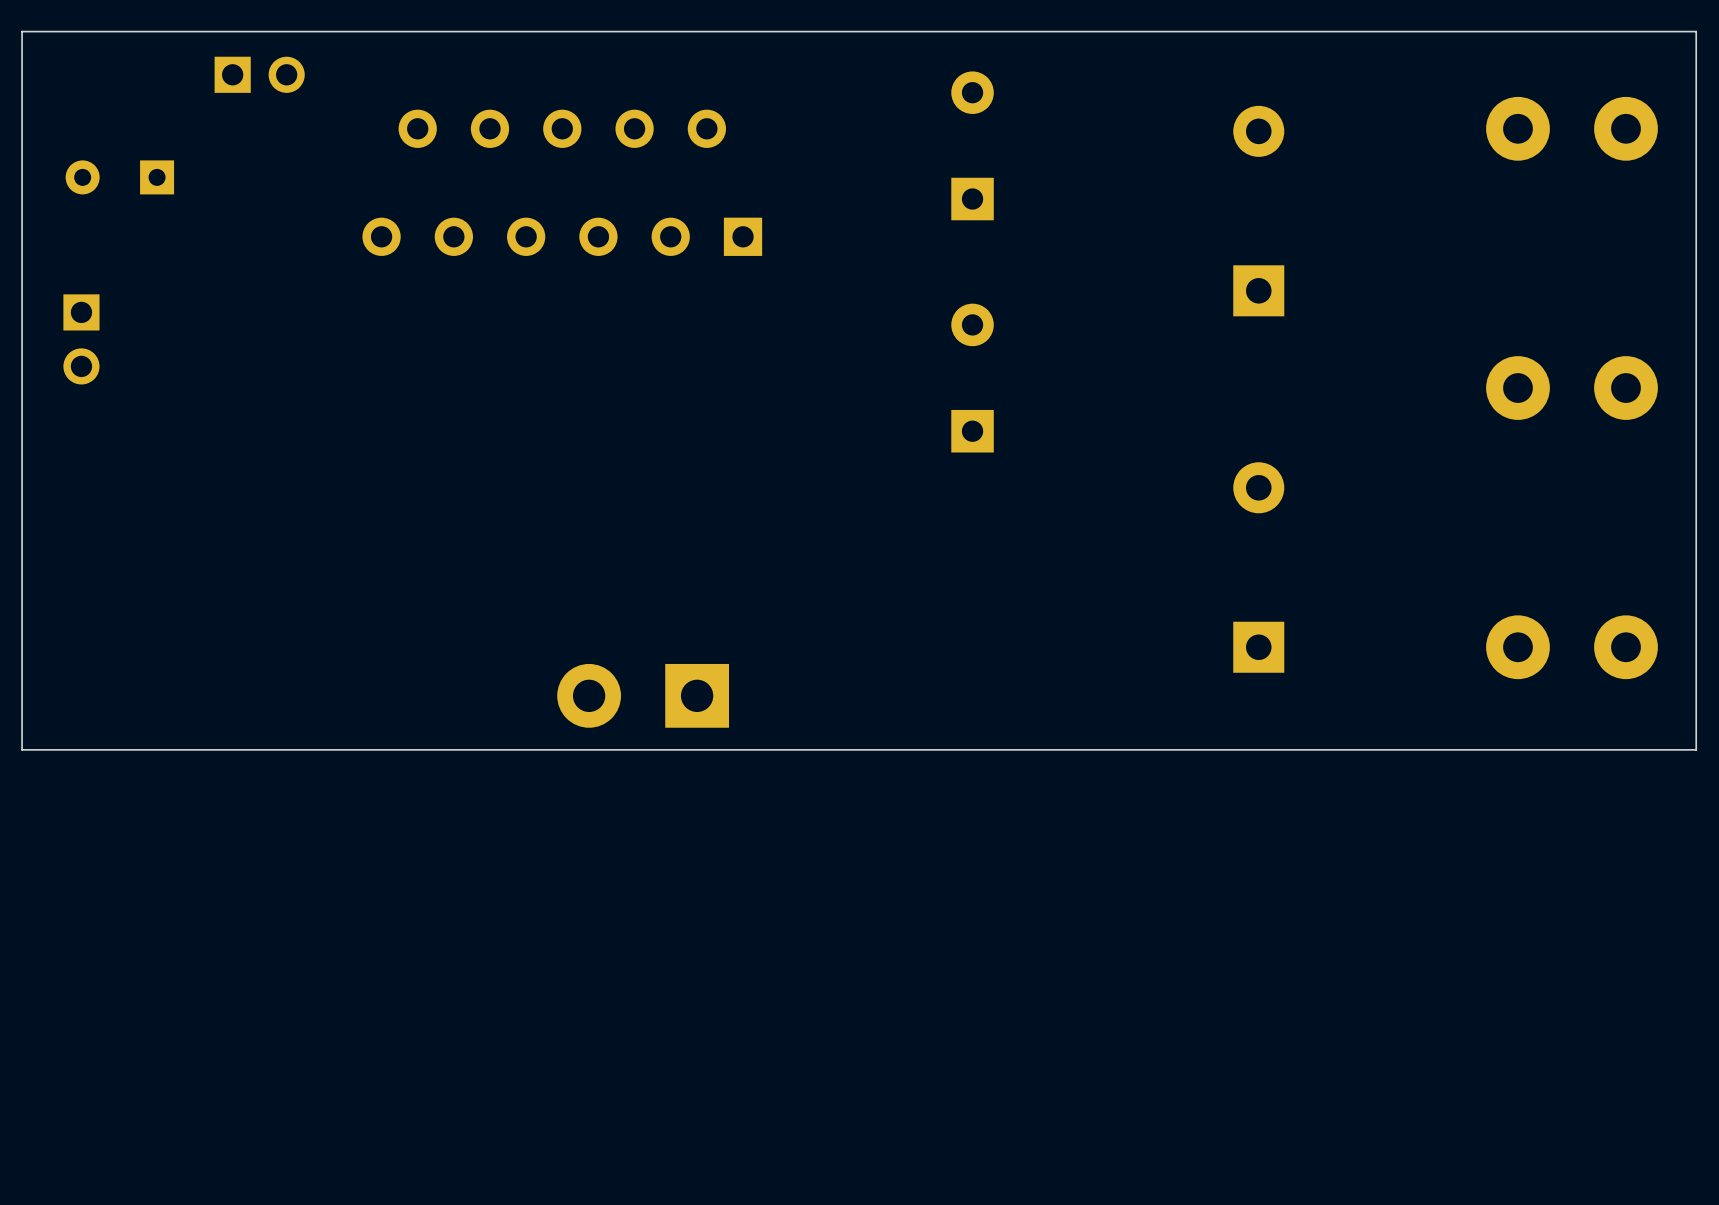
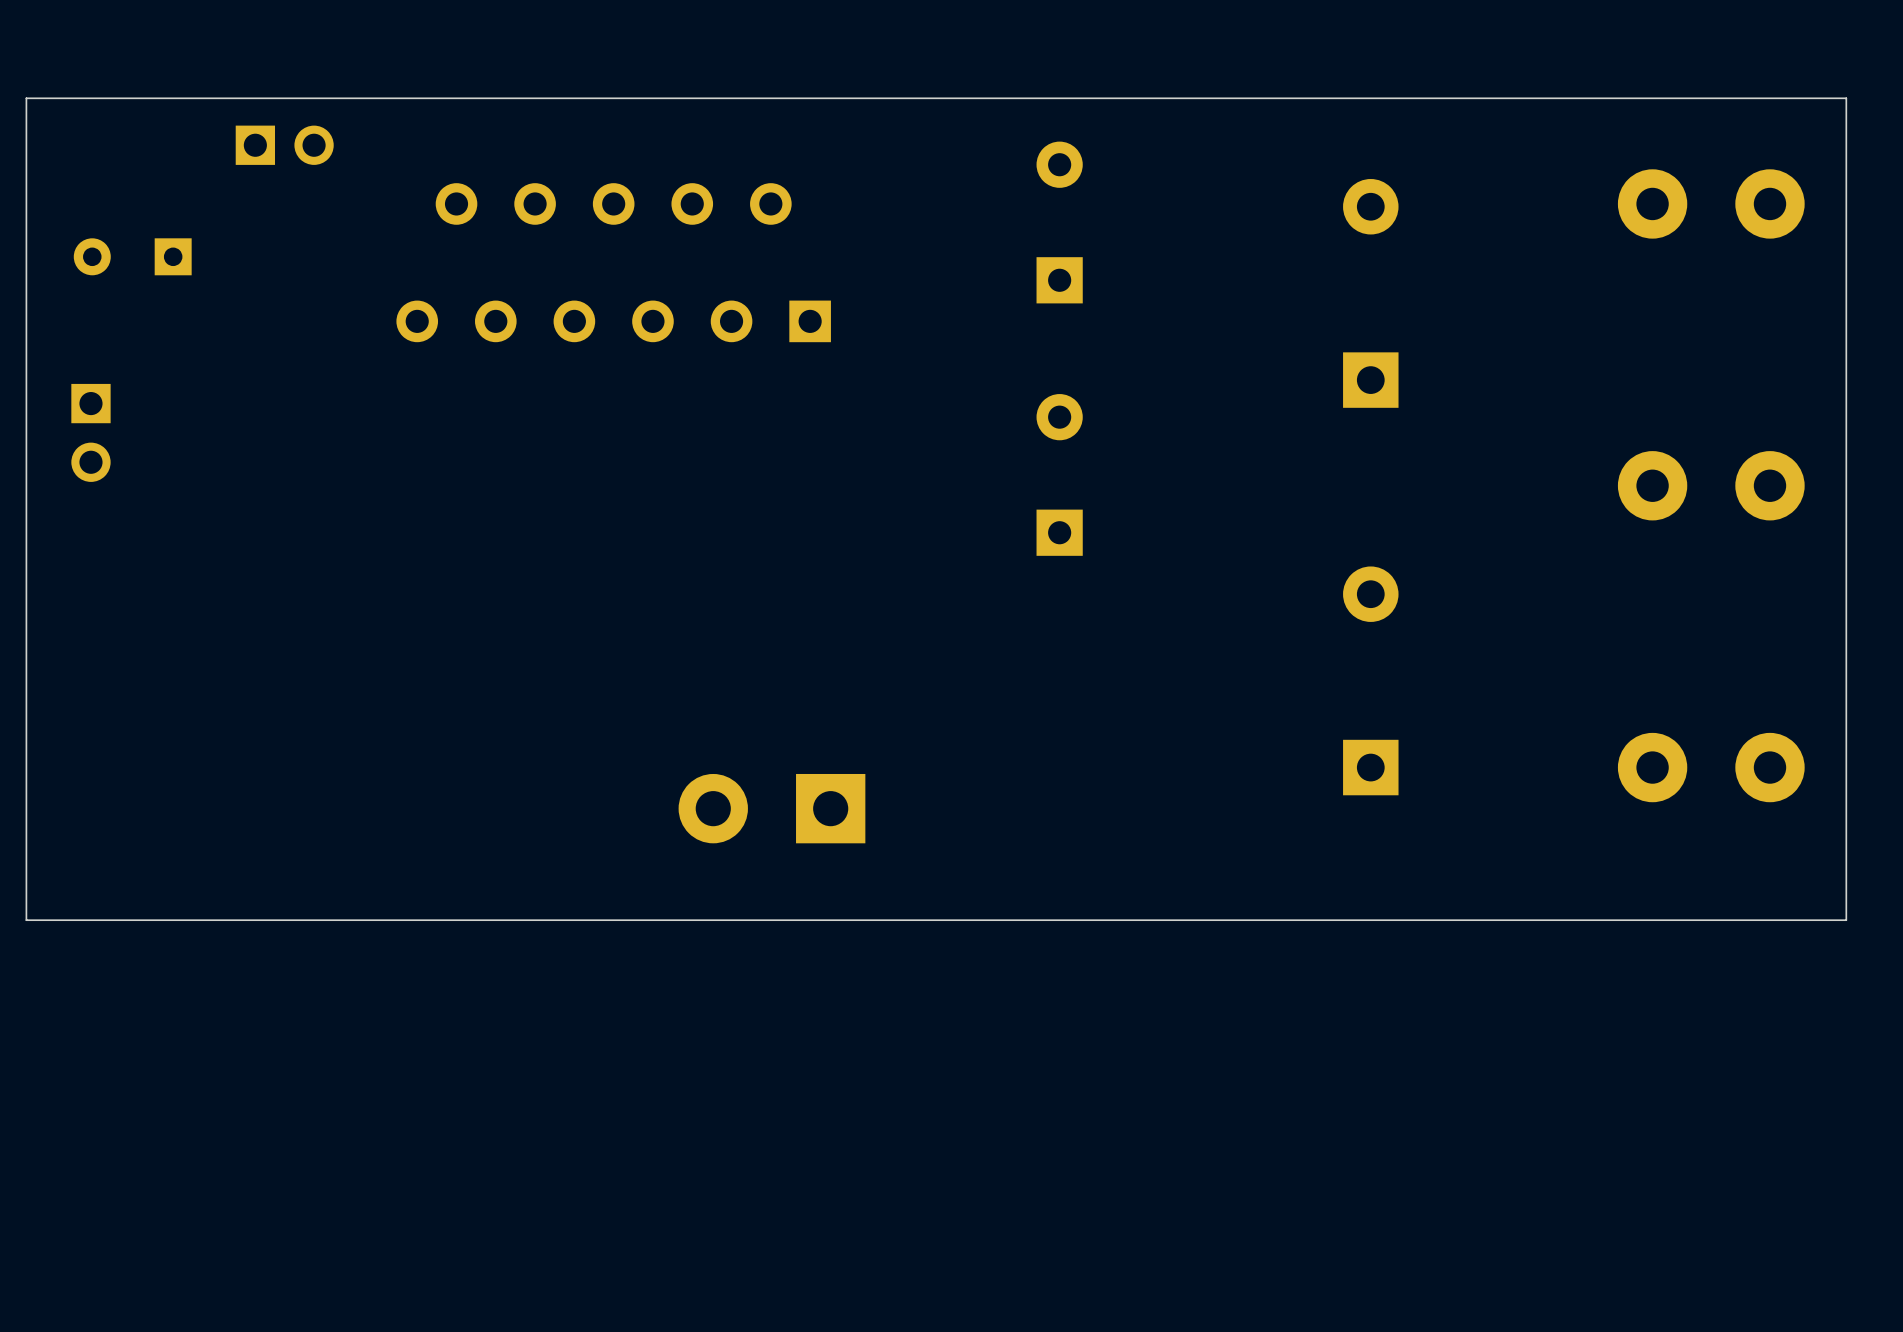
part position: (643, 695) -> (771, 808)
board edge: (1696, 749) (22, 749) -> (1846, 879) (1846, 920) (26, 920) (26, 879)

